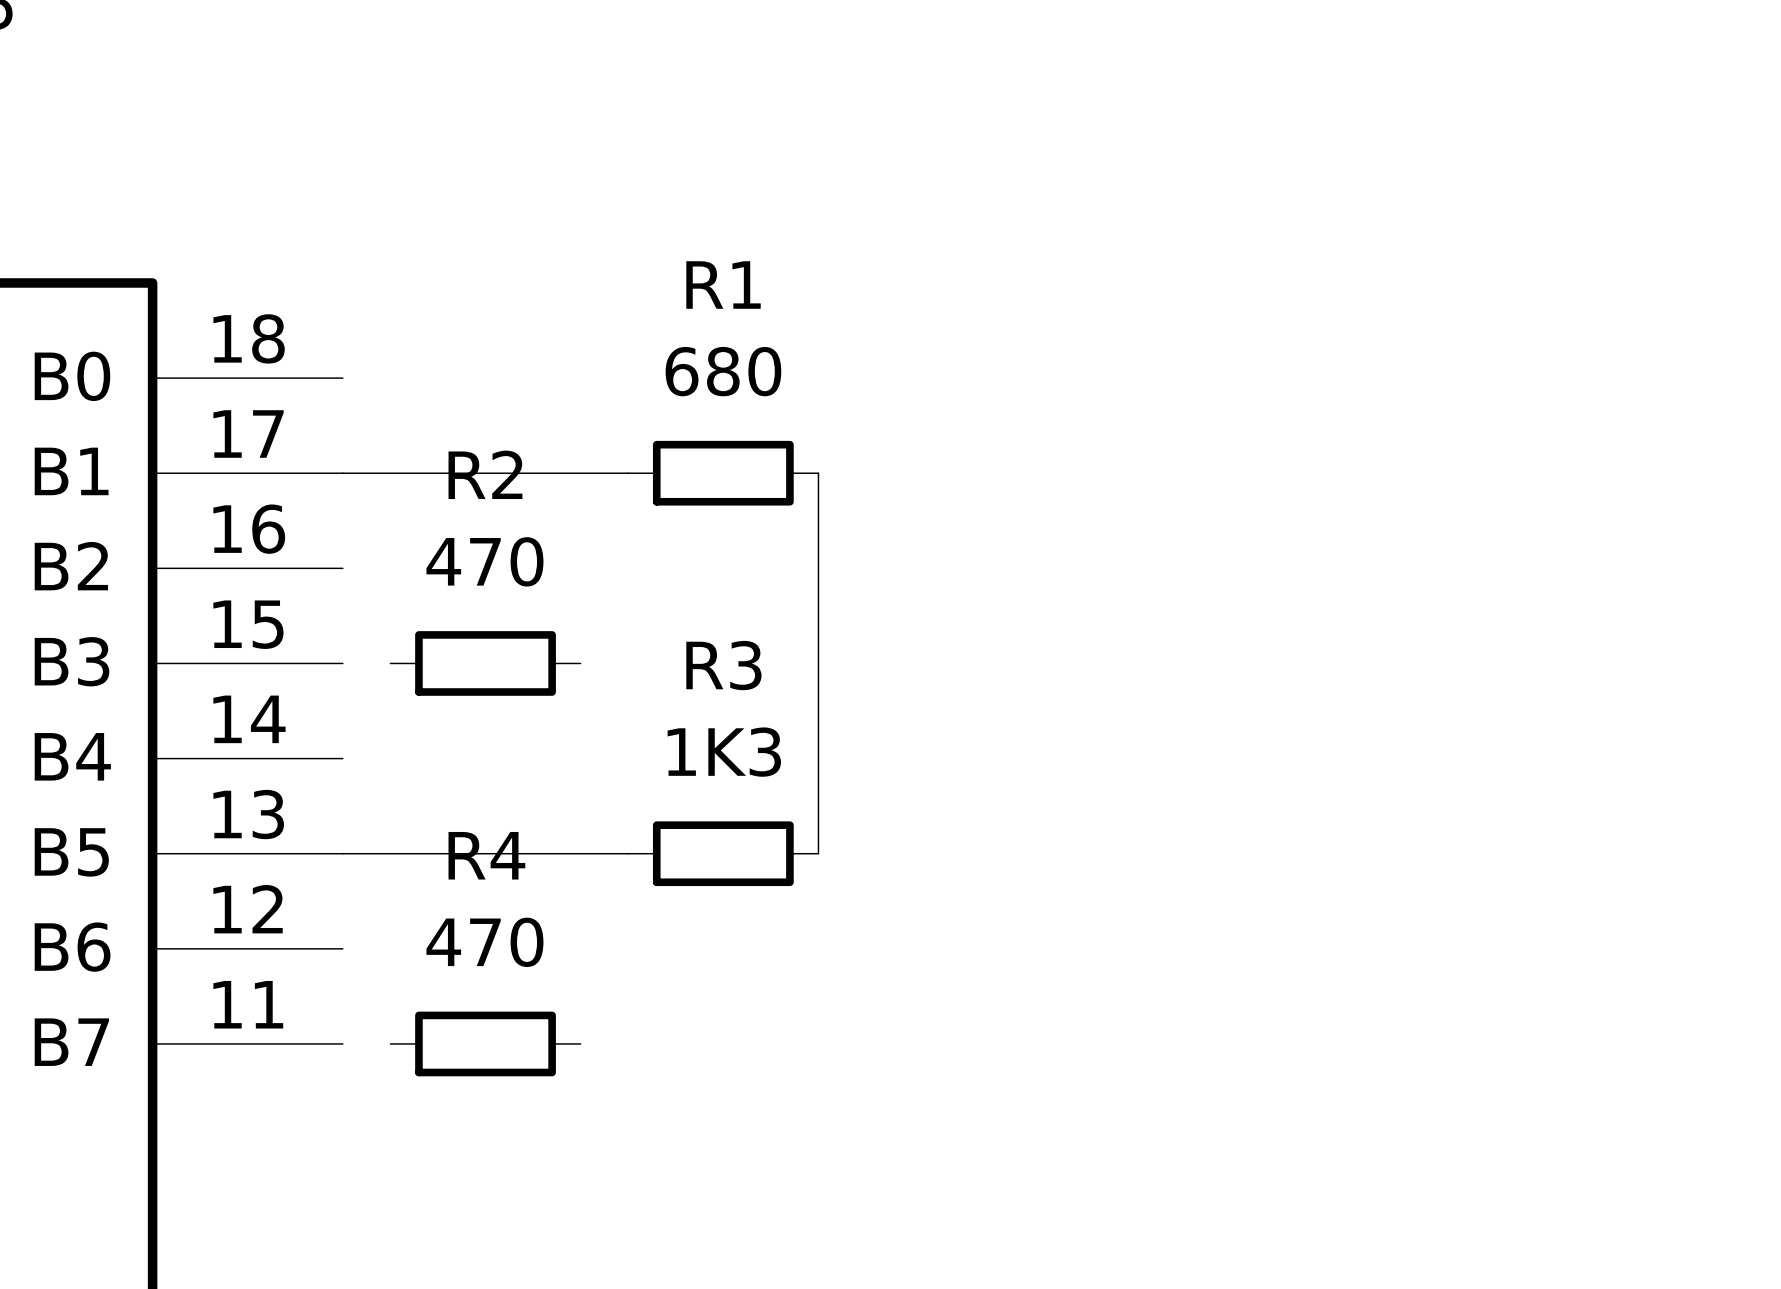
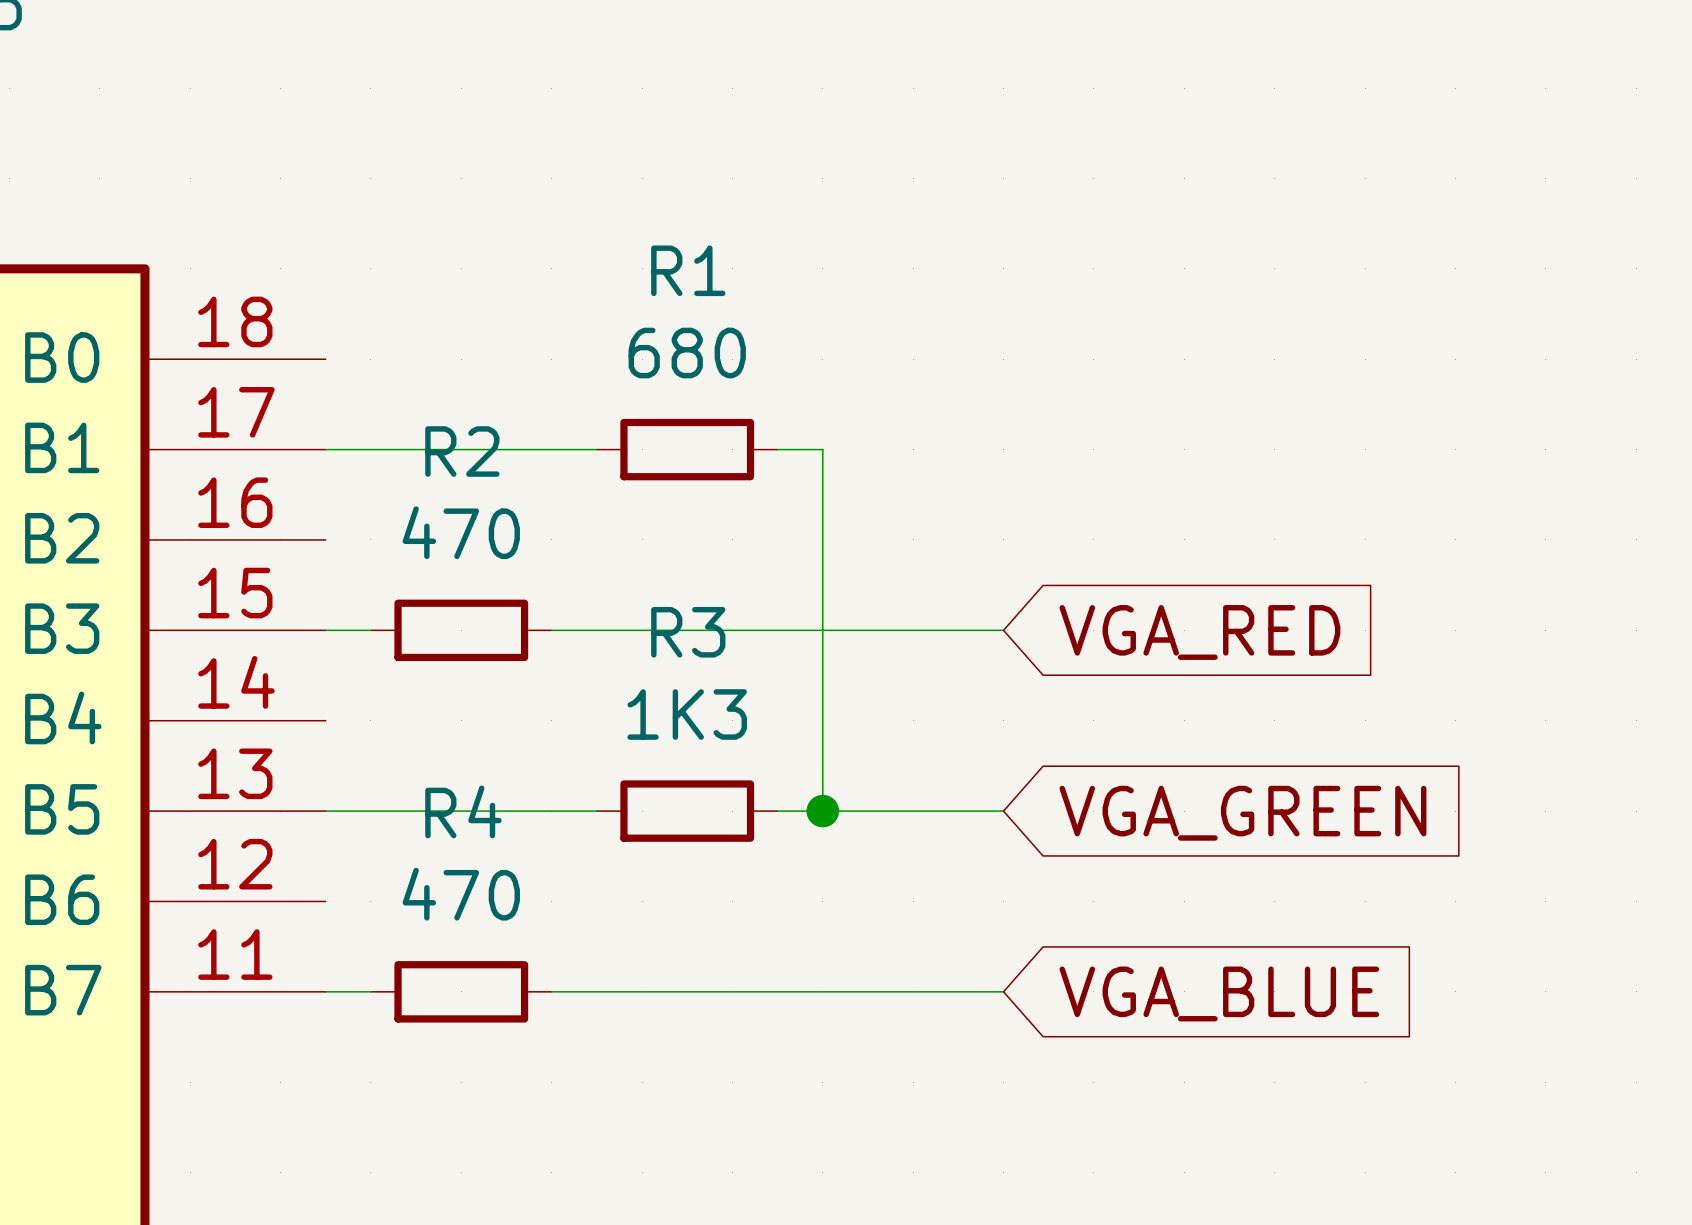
wire: (818, 473) (818, 853) -> (777, 449) (822, 449) (822, 811)
wire: none -> (325, 630) (370, 630)
wire: none -> (551, 630) (1003, 630)
global label: none -> VGA_RED (1199, 632)
wire: none -> (777, 811) (1003, 811)
junction: none -> (822, 811)
global label: none -> VGA_GREEN (1242, 813)
wire: none -> (325, 991) (370, 991)
wire: none -> (551, 991) (1003, 991)
global label: none -> VGA_BLUE (1219, 993)

